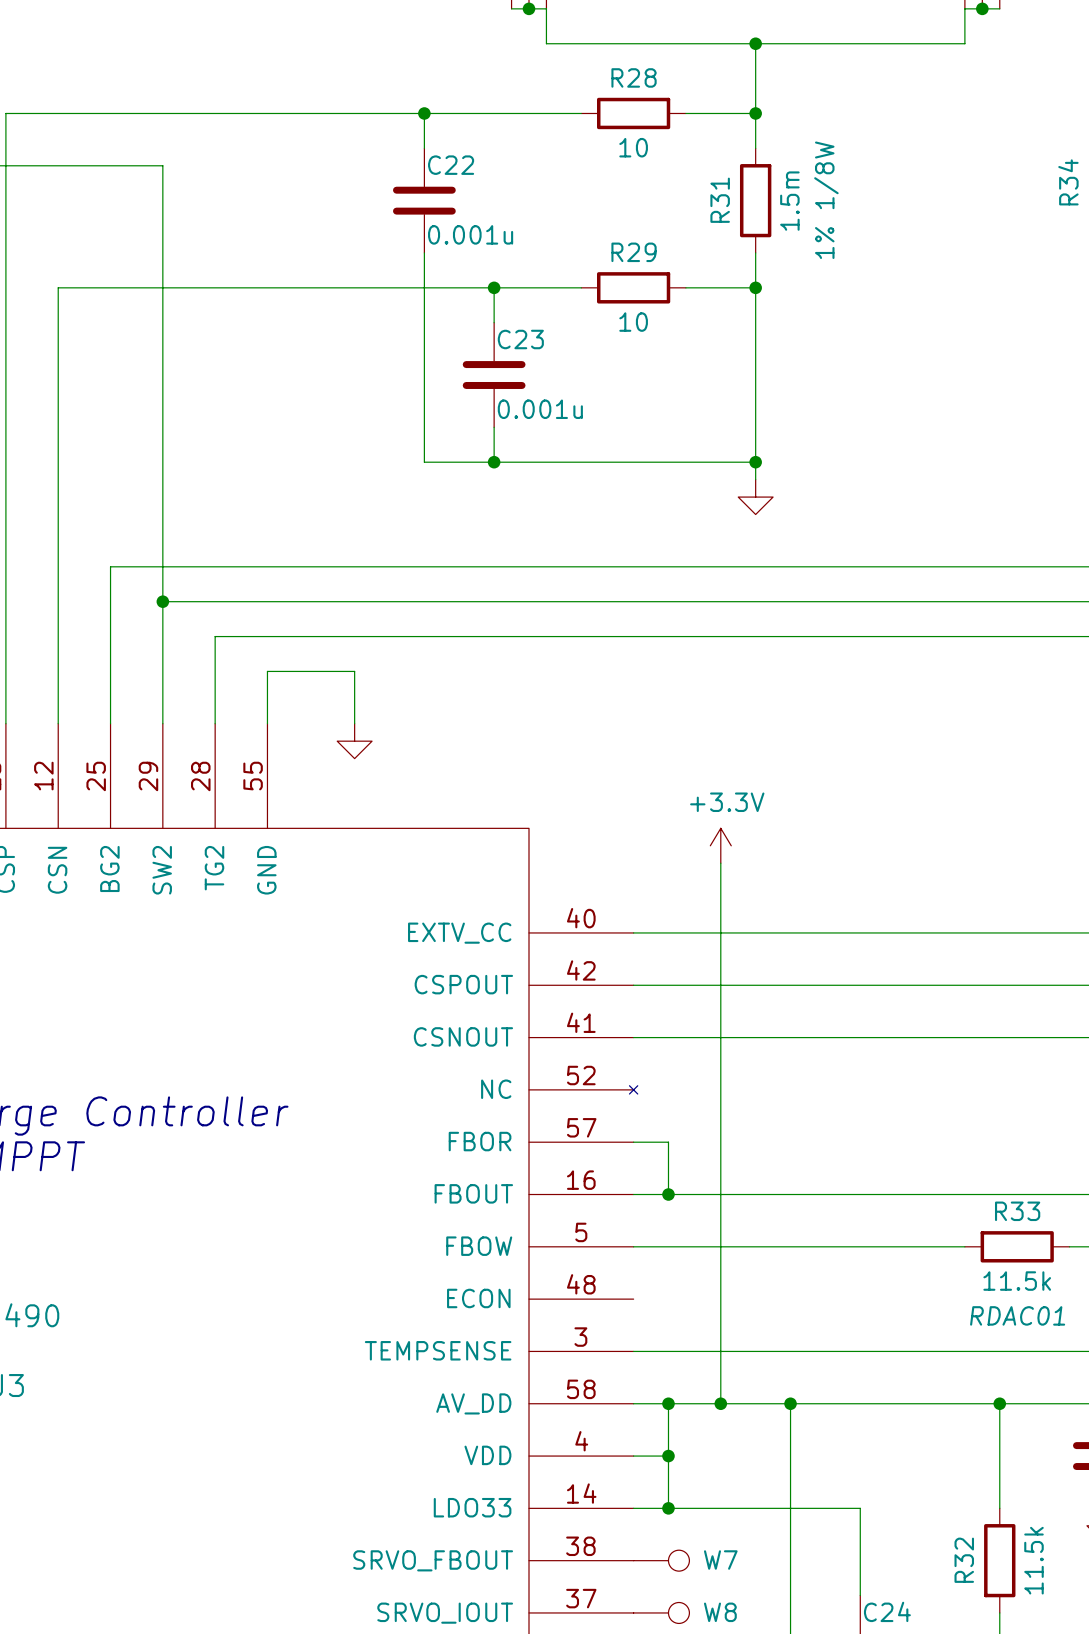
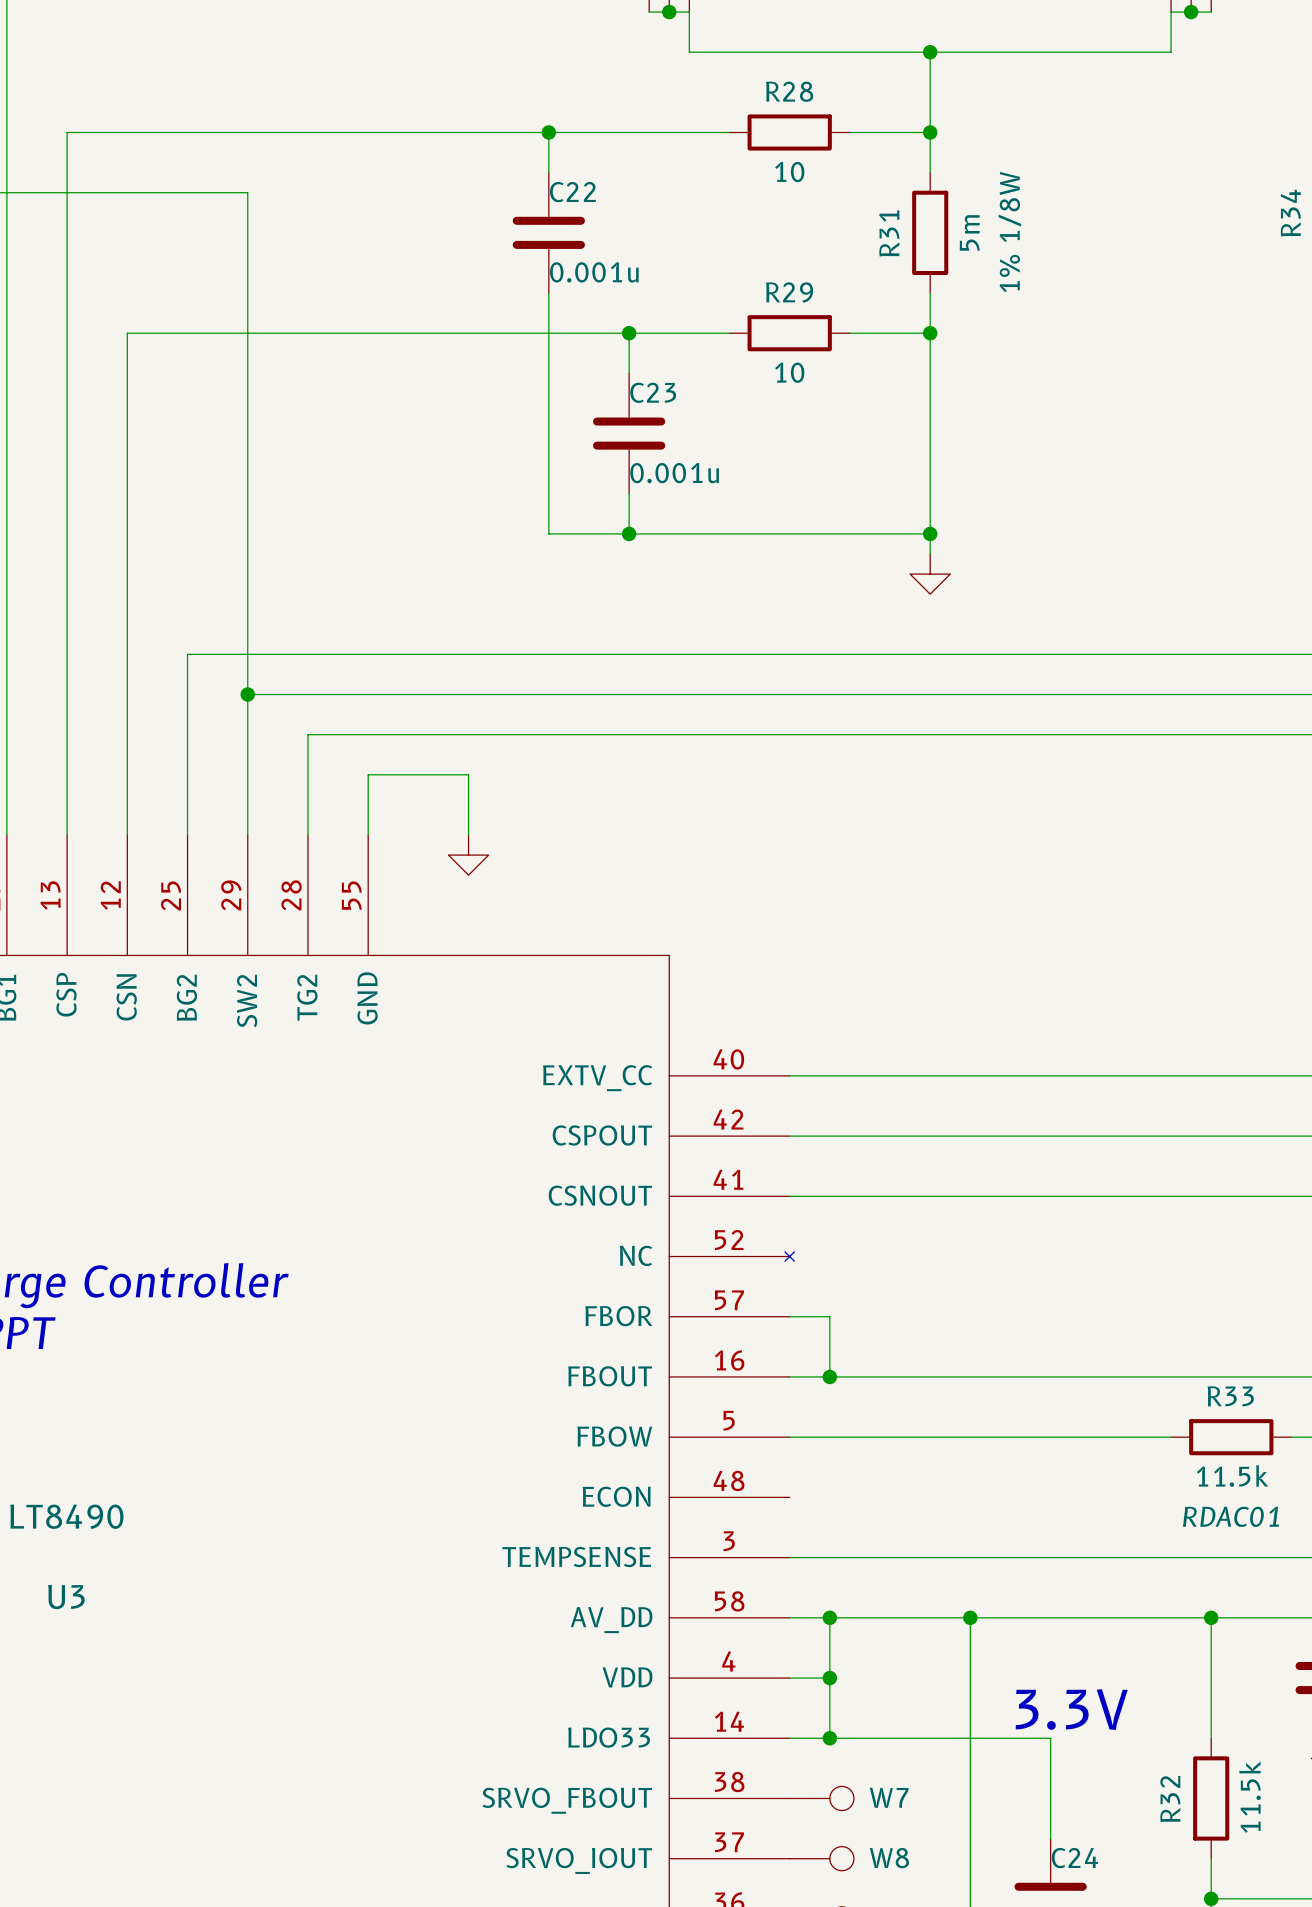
R31 value: 1.5m (789, 201) -> 5m (969, 232)
power symbol: +3.3V (720, 845) -> none
wire: (720, 863) (720, 1403) -> none
junction: (720, 1403) -> none
text: none -> 3.3V (1071, 1709)

